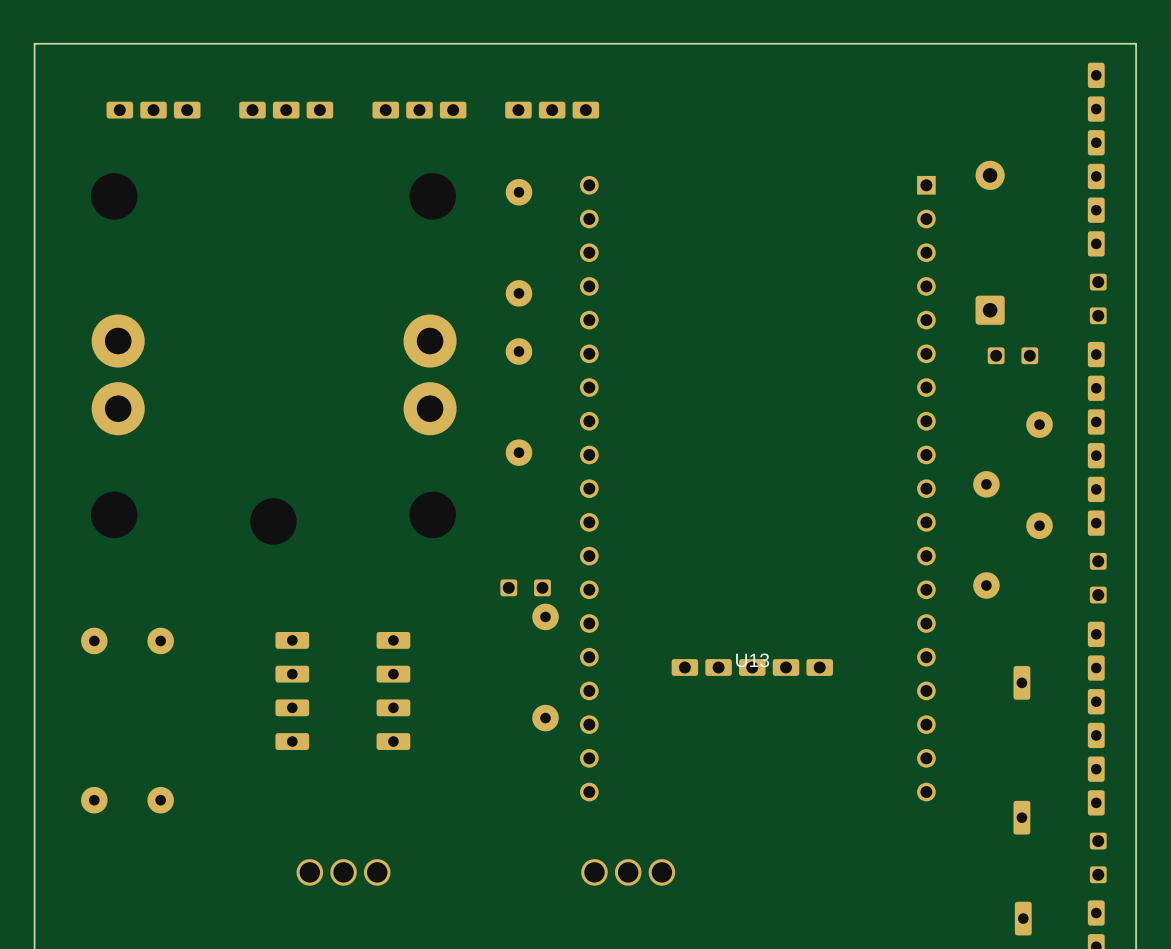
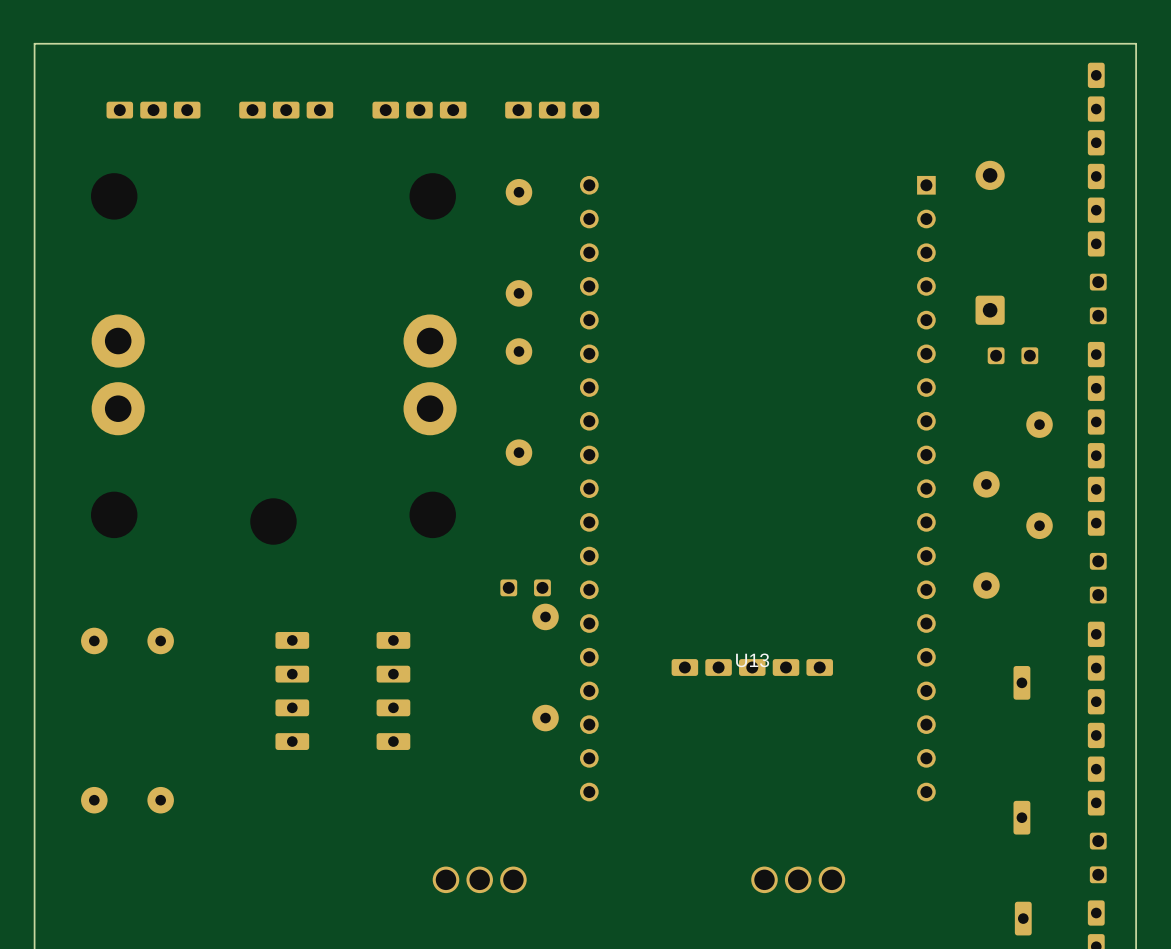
part: (343, 872) -> none
part: (628, 872) -> none
part: none -> (479, 879)
part: none -> (798, 879)

